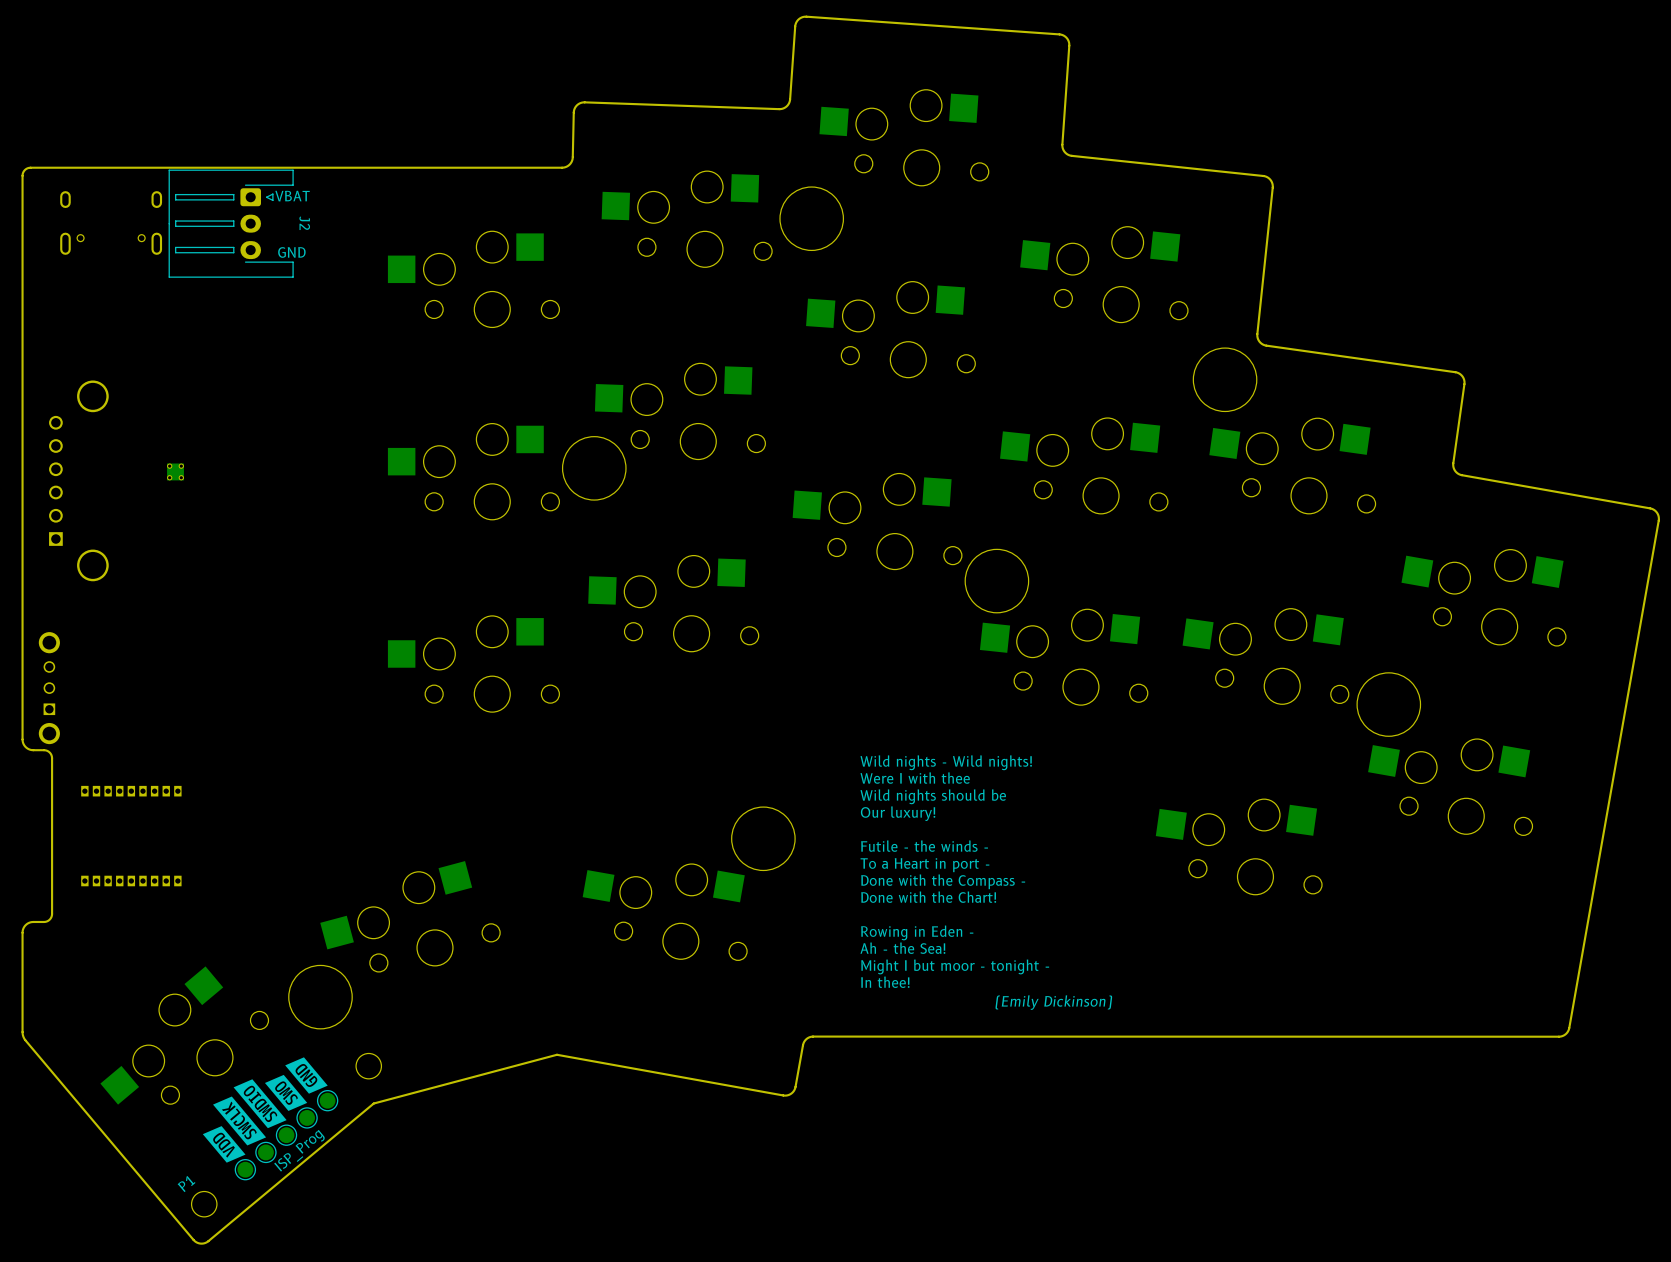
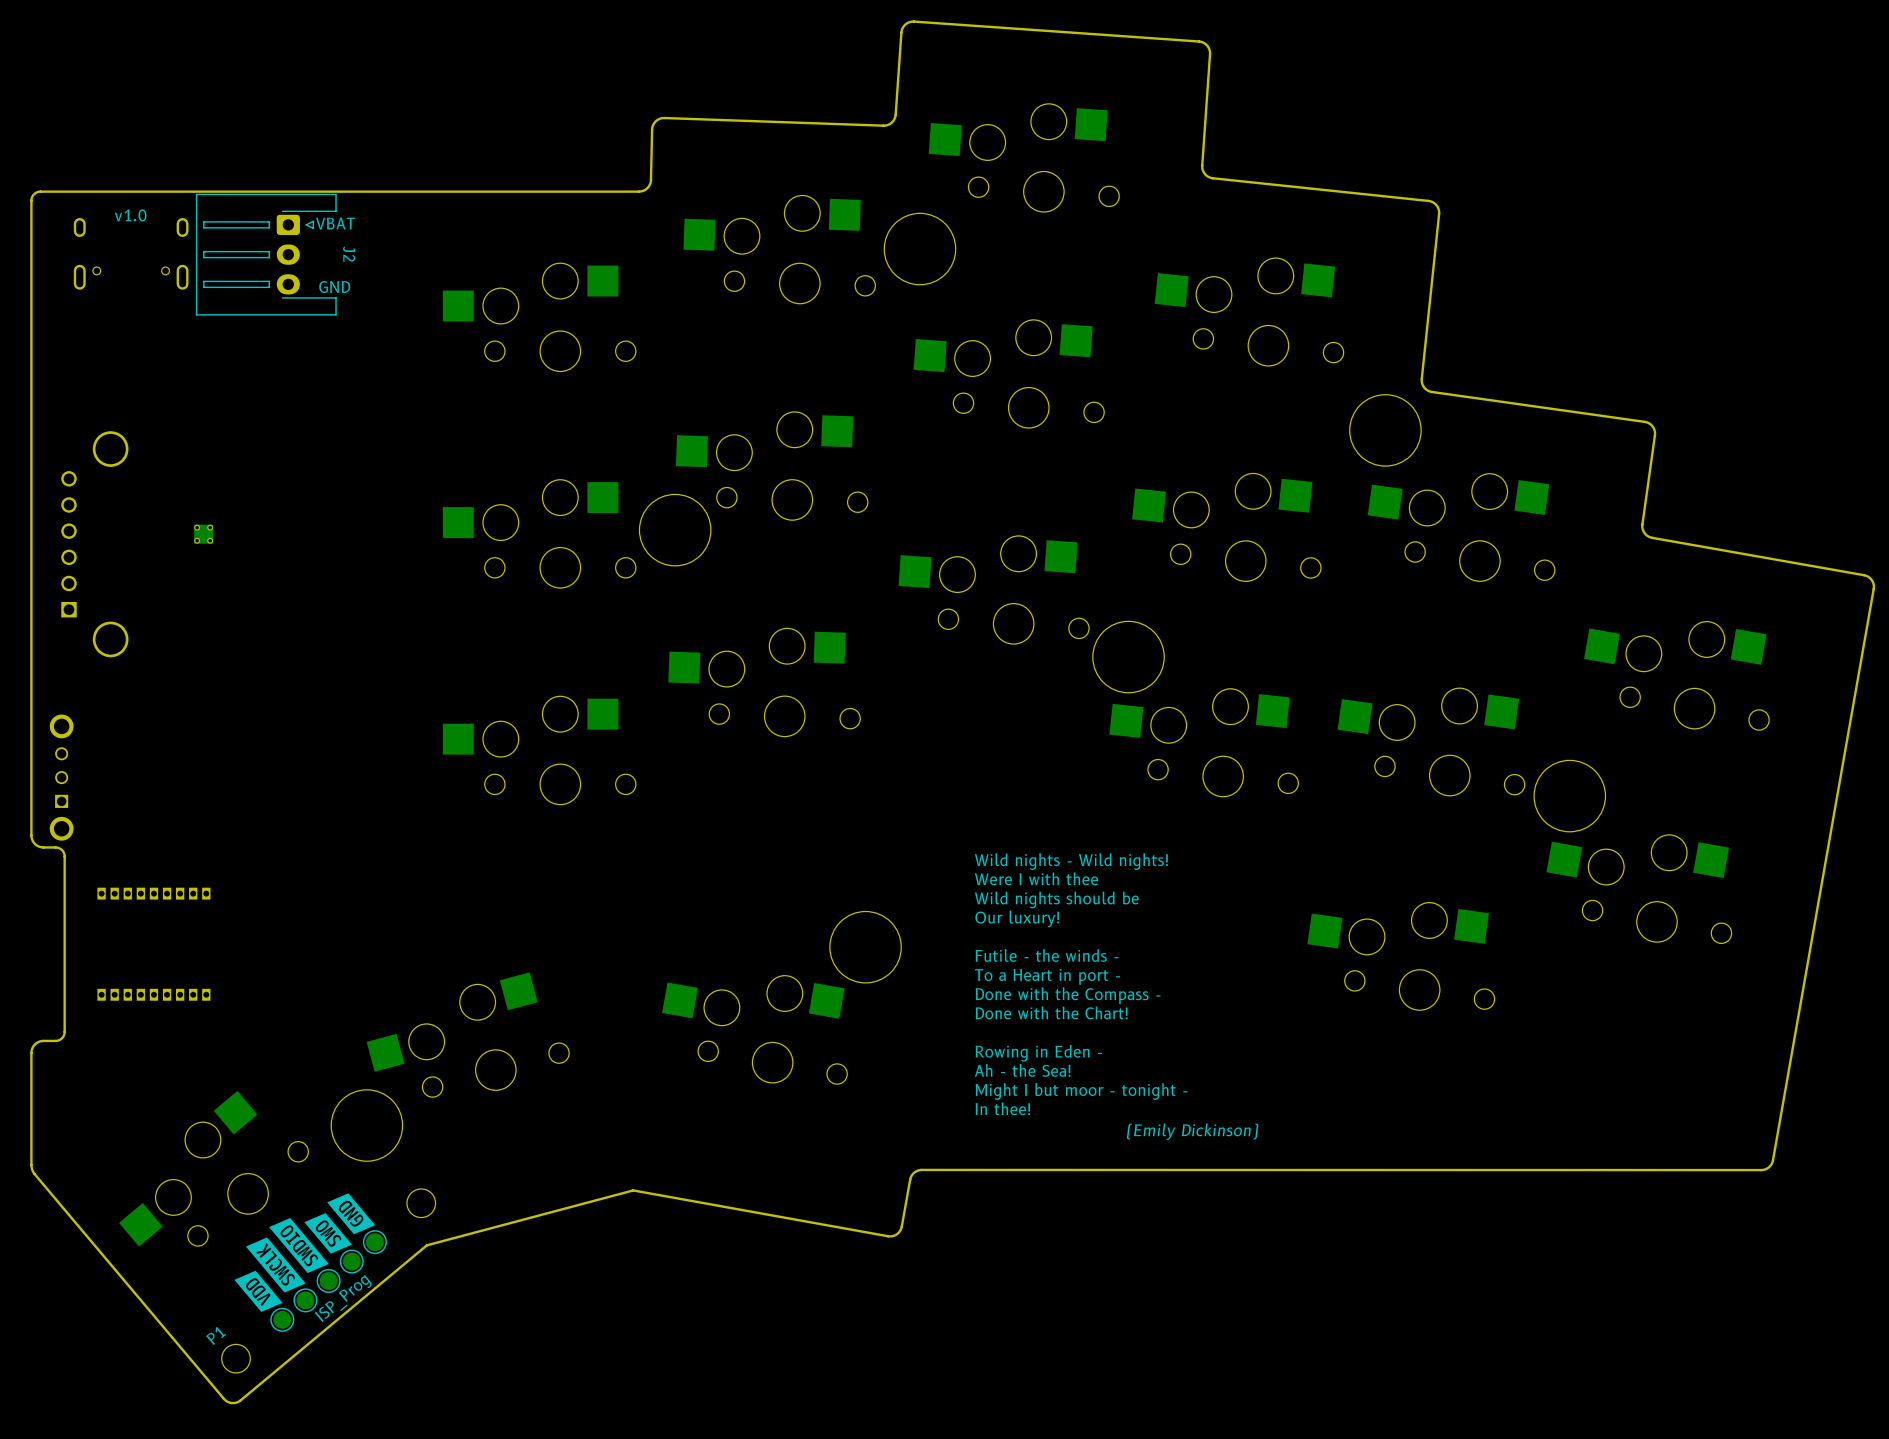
text: none -> v1.0 (130, 215)

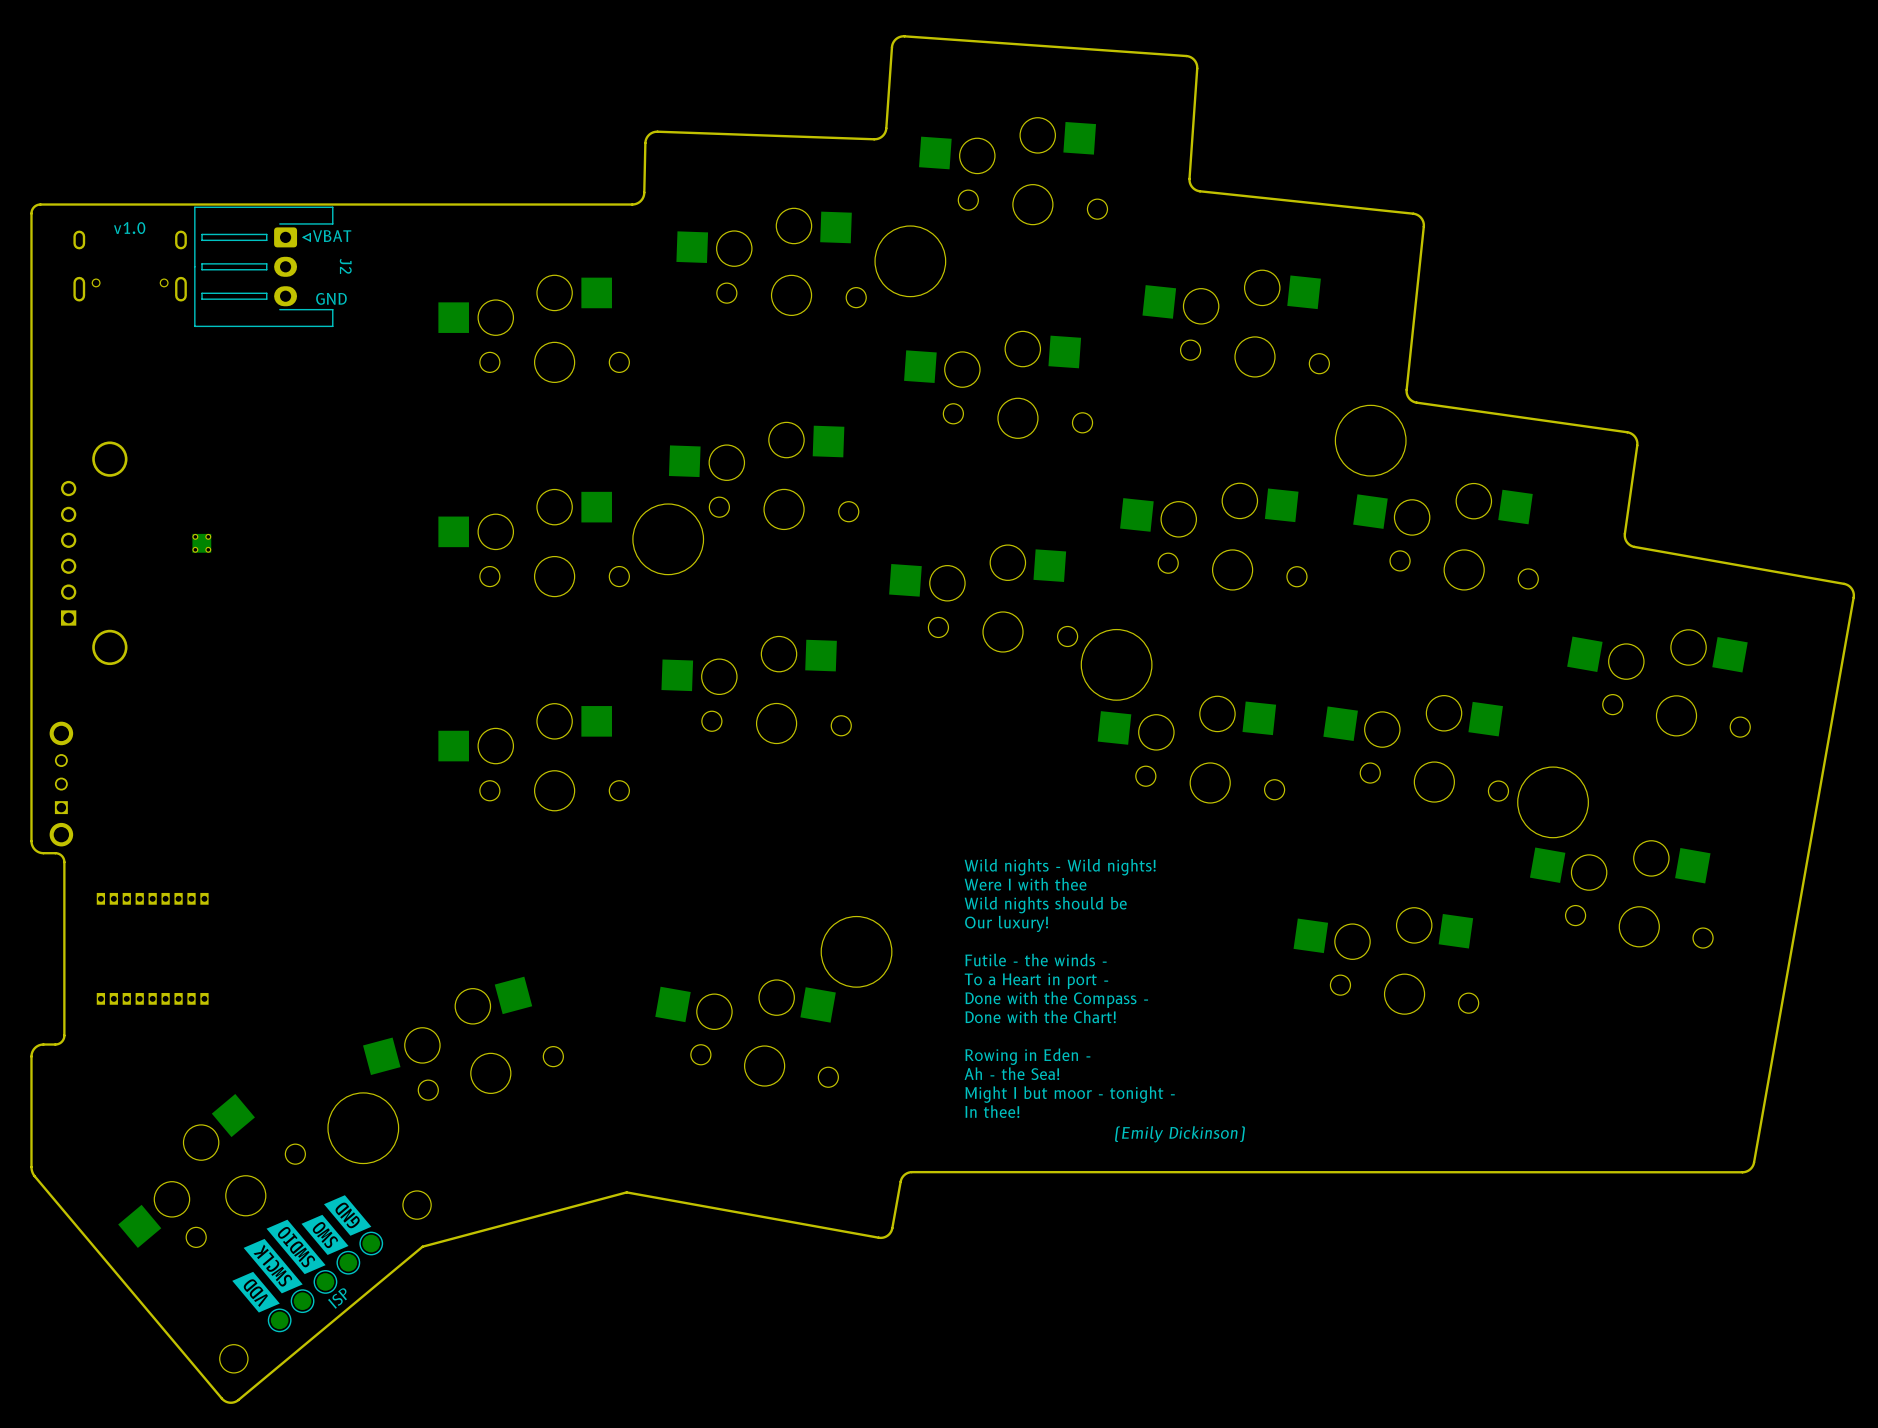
P1 value: ISP_Prog (343, 1298) -> ISP (337, 1298)
P1 name: P1 (216, 1336) -> none

